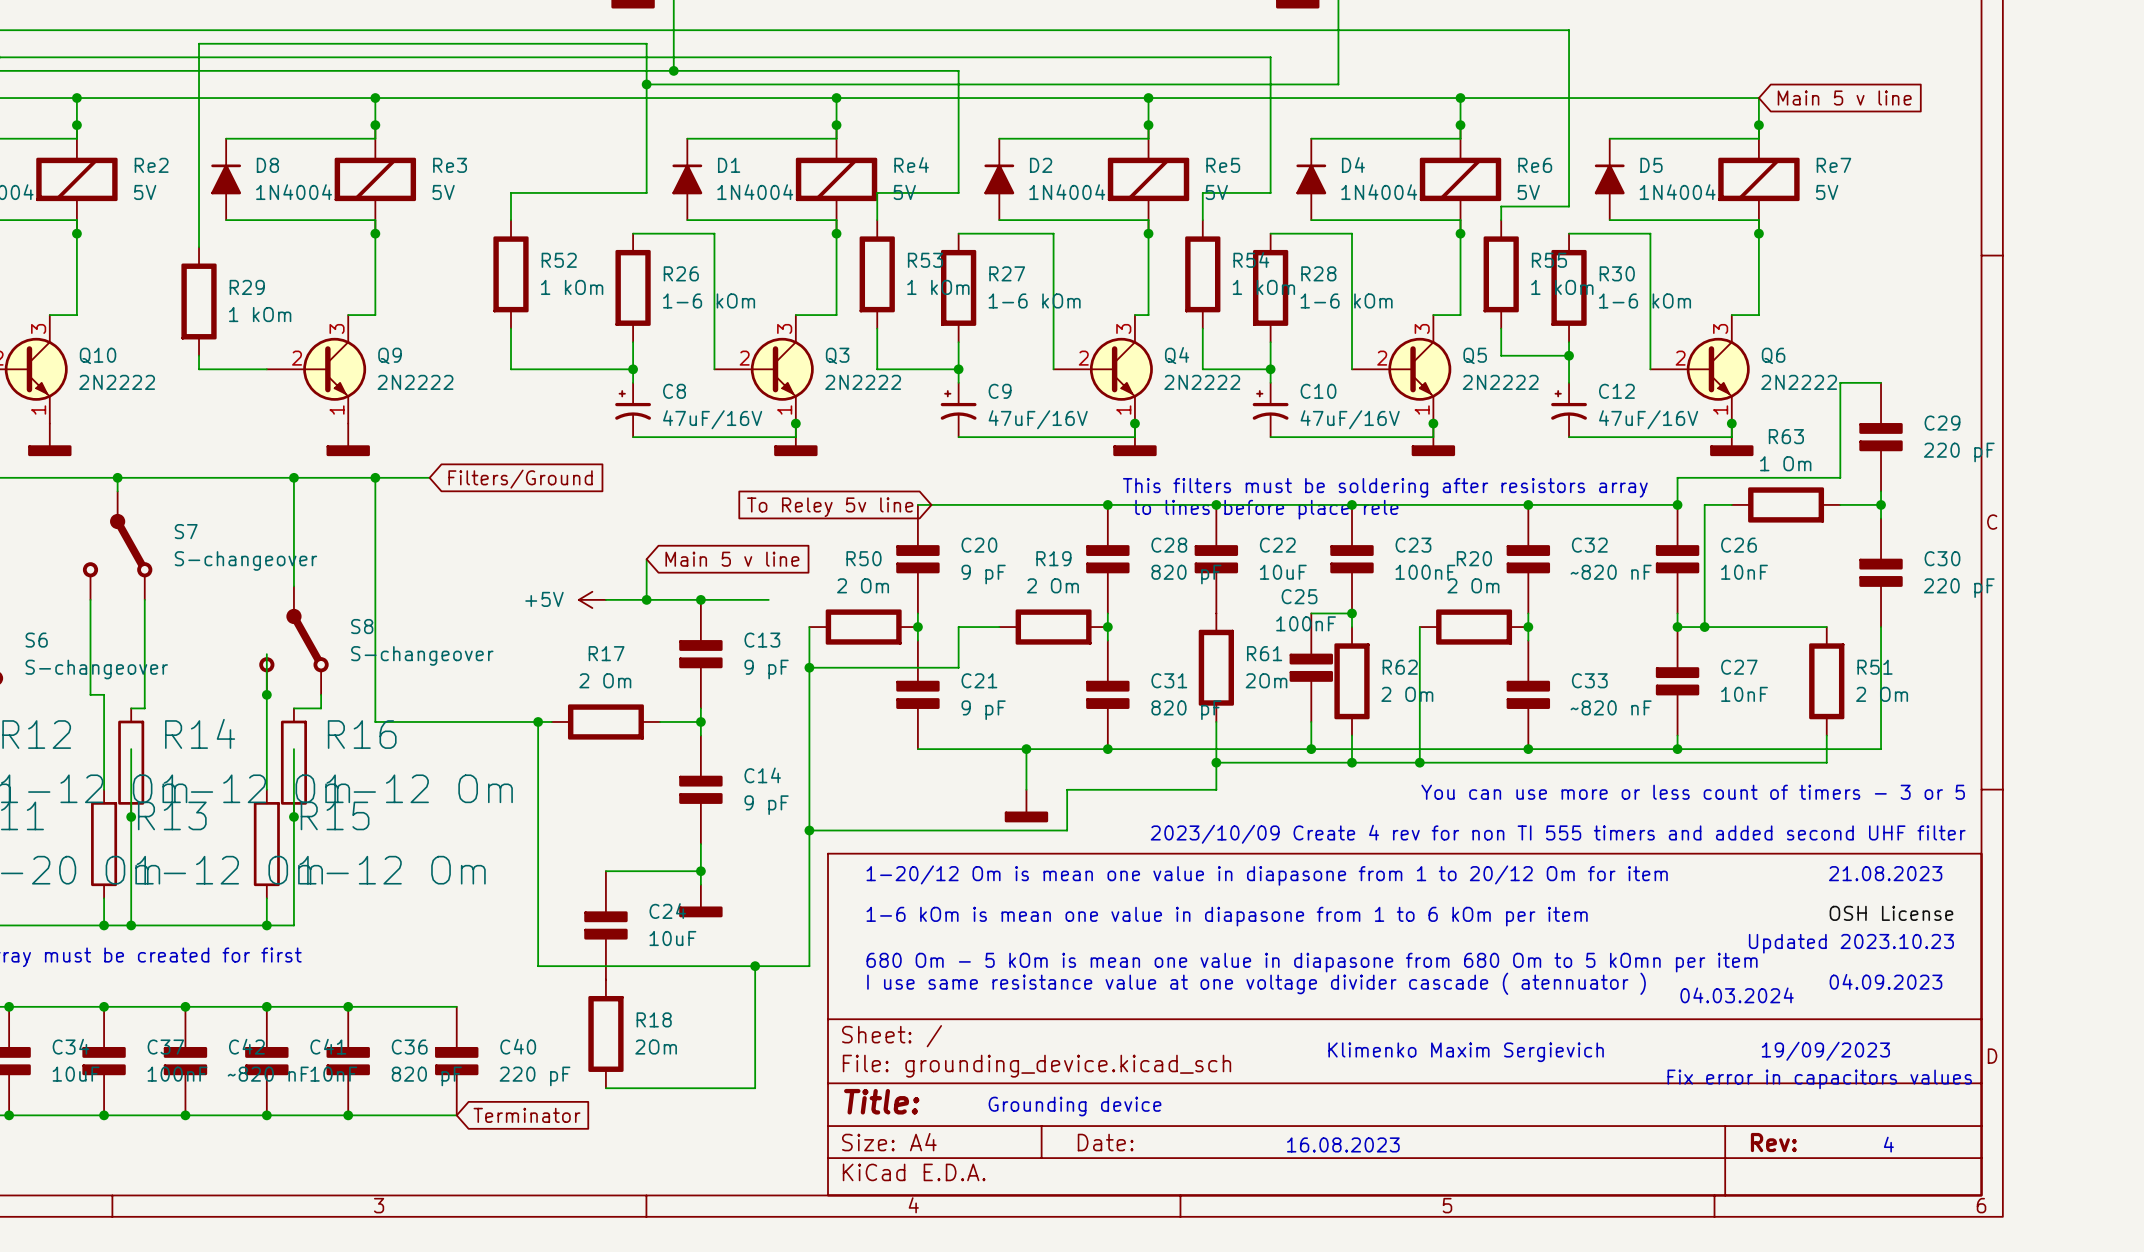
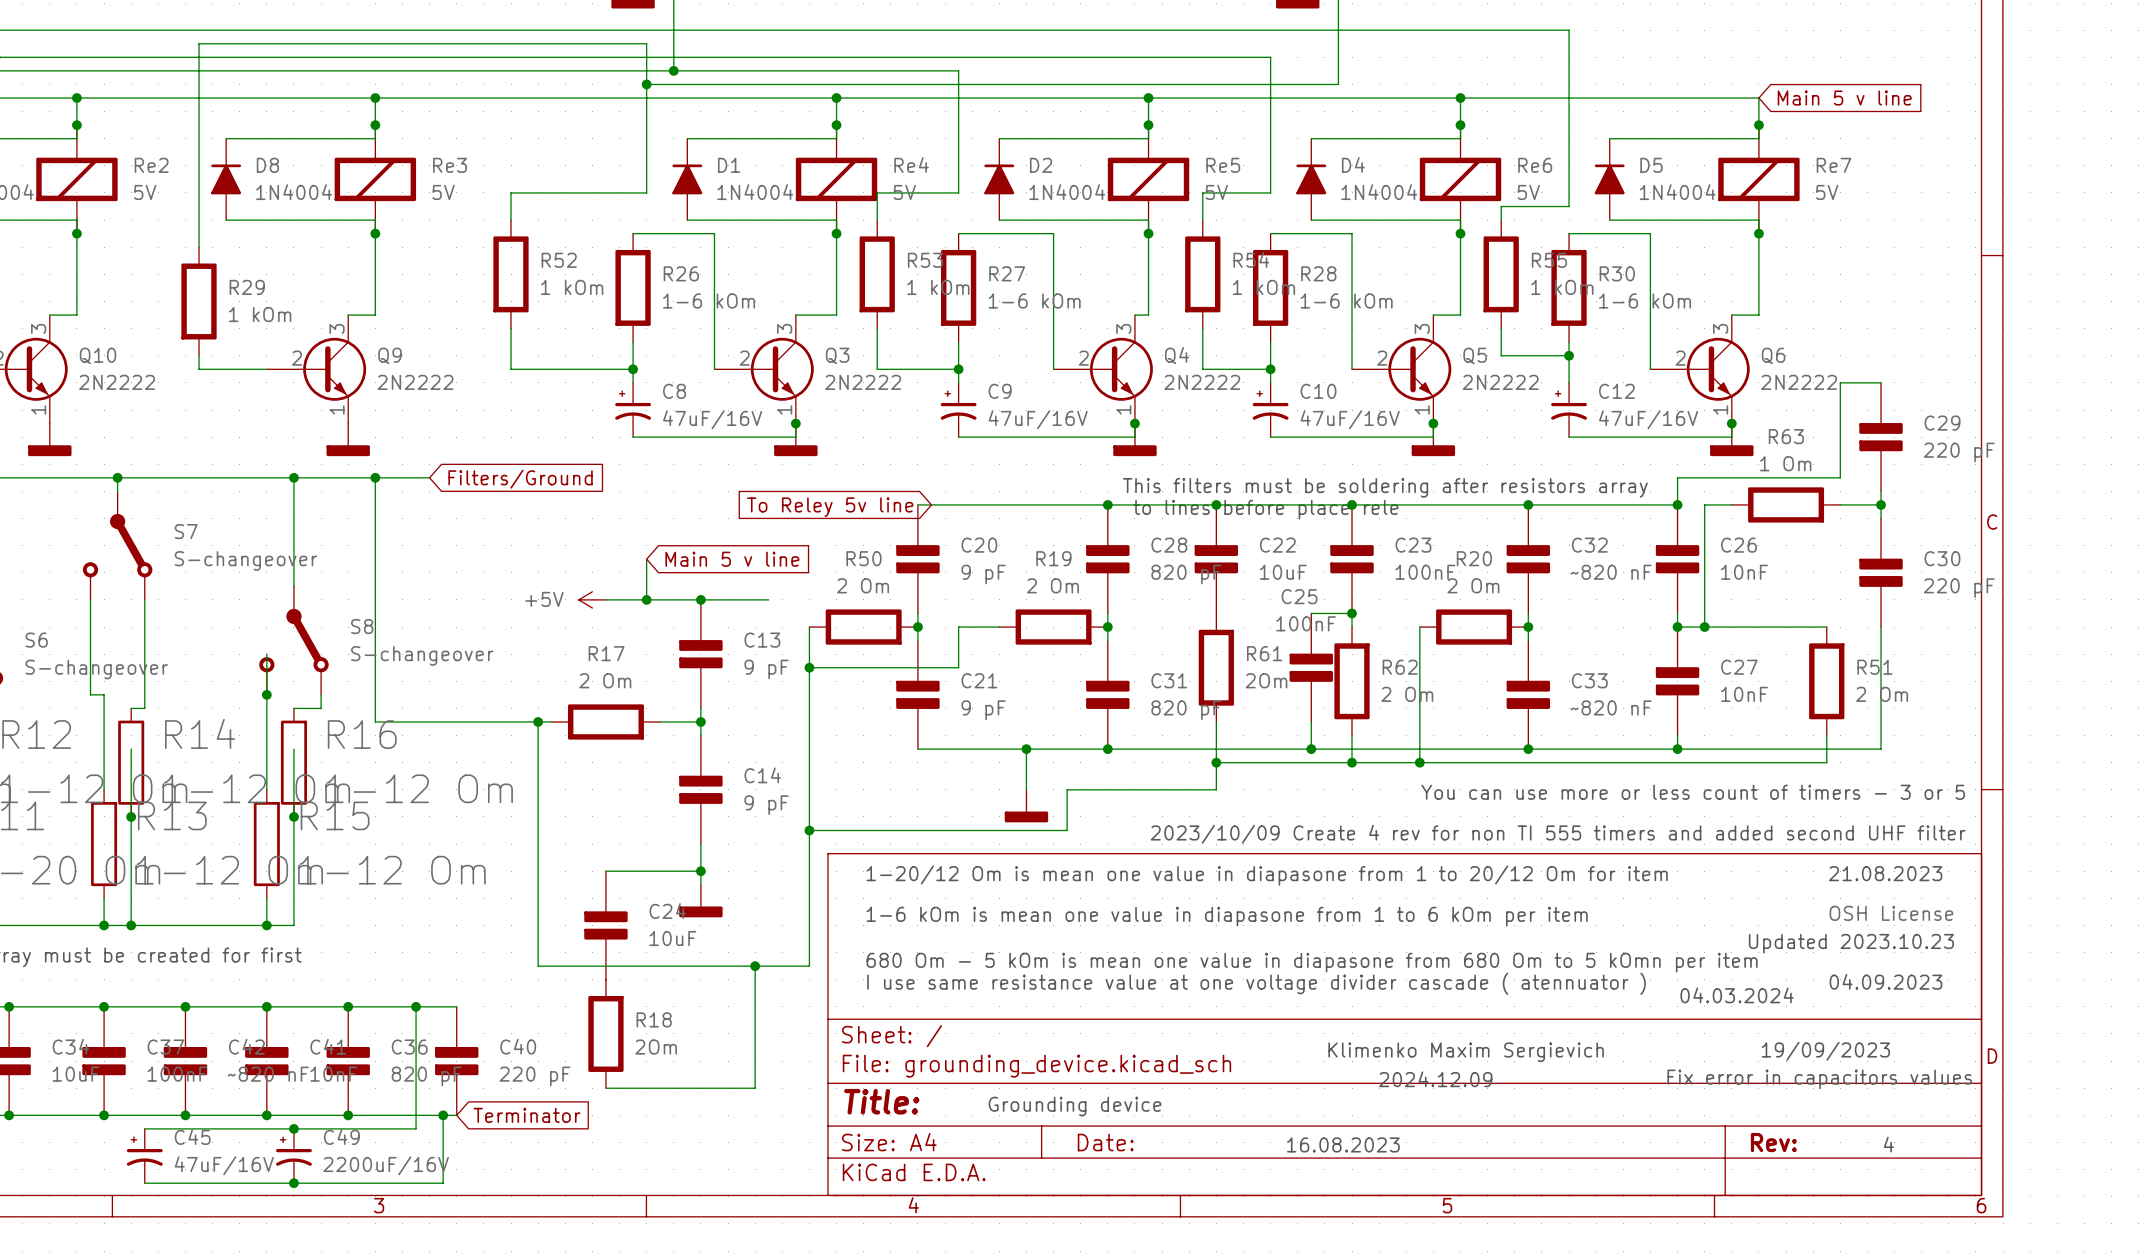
wire: none -> (416, 1006) (416, 1128) (144, 1128)
junction: none -> (416, 1006)
text: none -> 2024.12.09 (1435, 1079)
wire: none -> (443, 1115) (443, 1183) (144, 1183)
junction: none -> (443, 1115)
junction: none -> (293, 1128)
C45: none -> (144, 1156)
C49: none -> (293, 1156)
junction: none -> (293, 1183)

